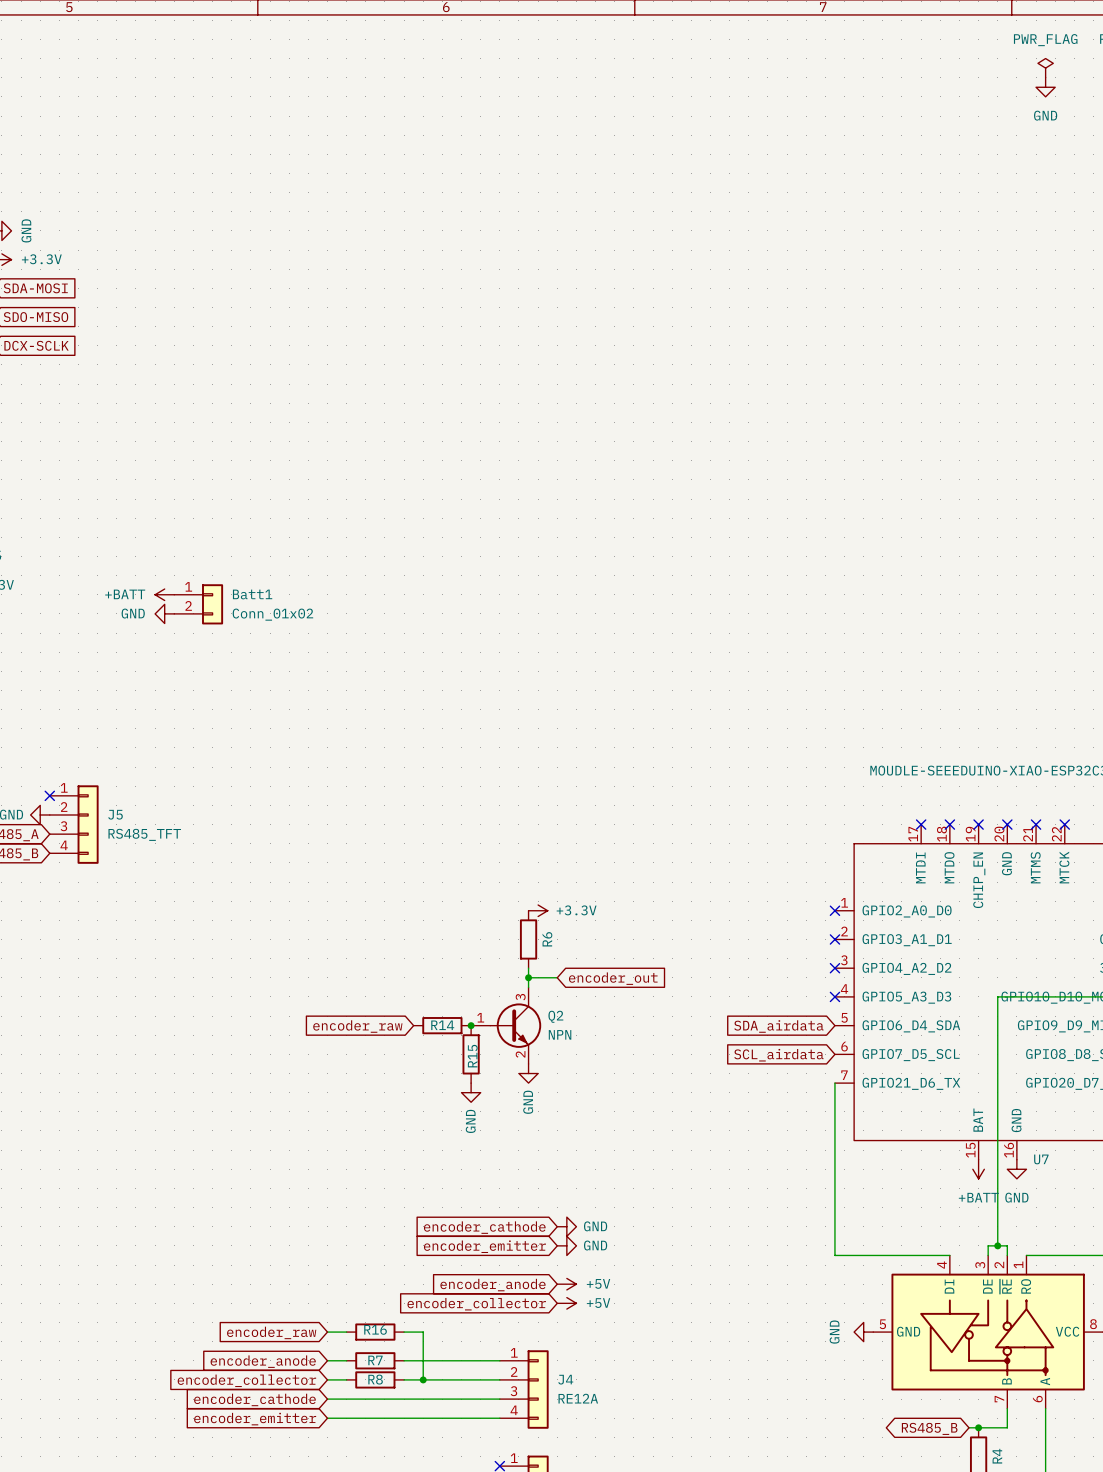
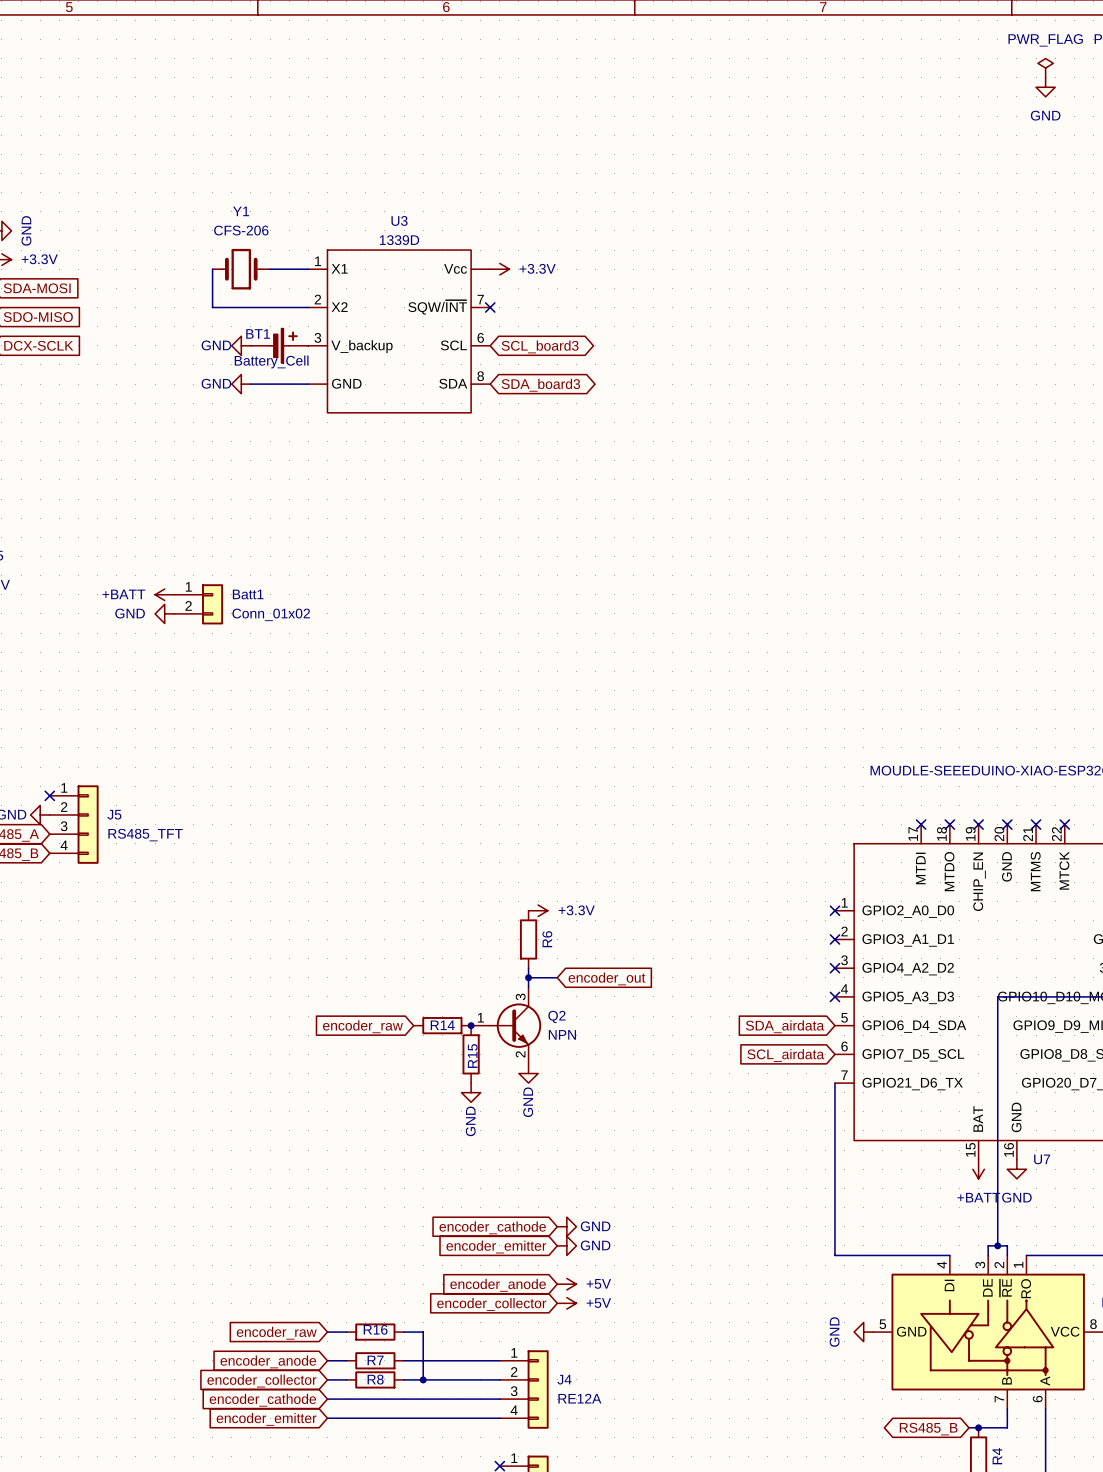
wire: none -> (212, 269) (212, 307) (308, 307)
Y1: none -> CFS-206 (241, 269)
wire: none -> (270, 269) (308, 269)
power symbol: none -> +3.3V (499, 269)
no-connect mark: none -> (490, 307)
U3: none -> 1339D (399, 331)
power symbol: none -> GND (241, 345)
BT1: none -> Battery_Cell (279, 345)
global label: none -> SCL_board3 (540, 346)
power symbol: none -> GND (241, 384)
wire: none -> (250, 384) (308, 384)
global label: none -> SDA_board3 (540, 385)

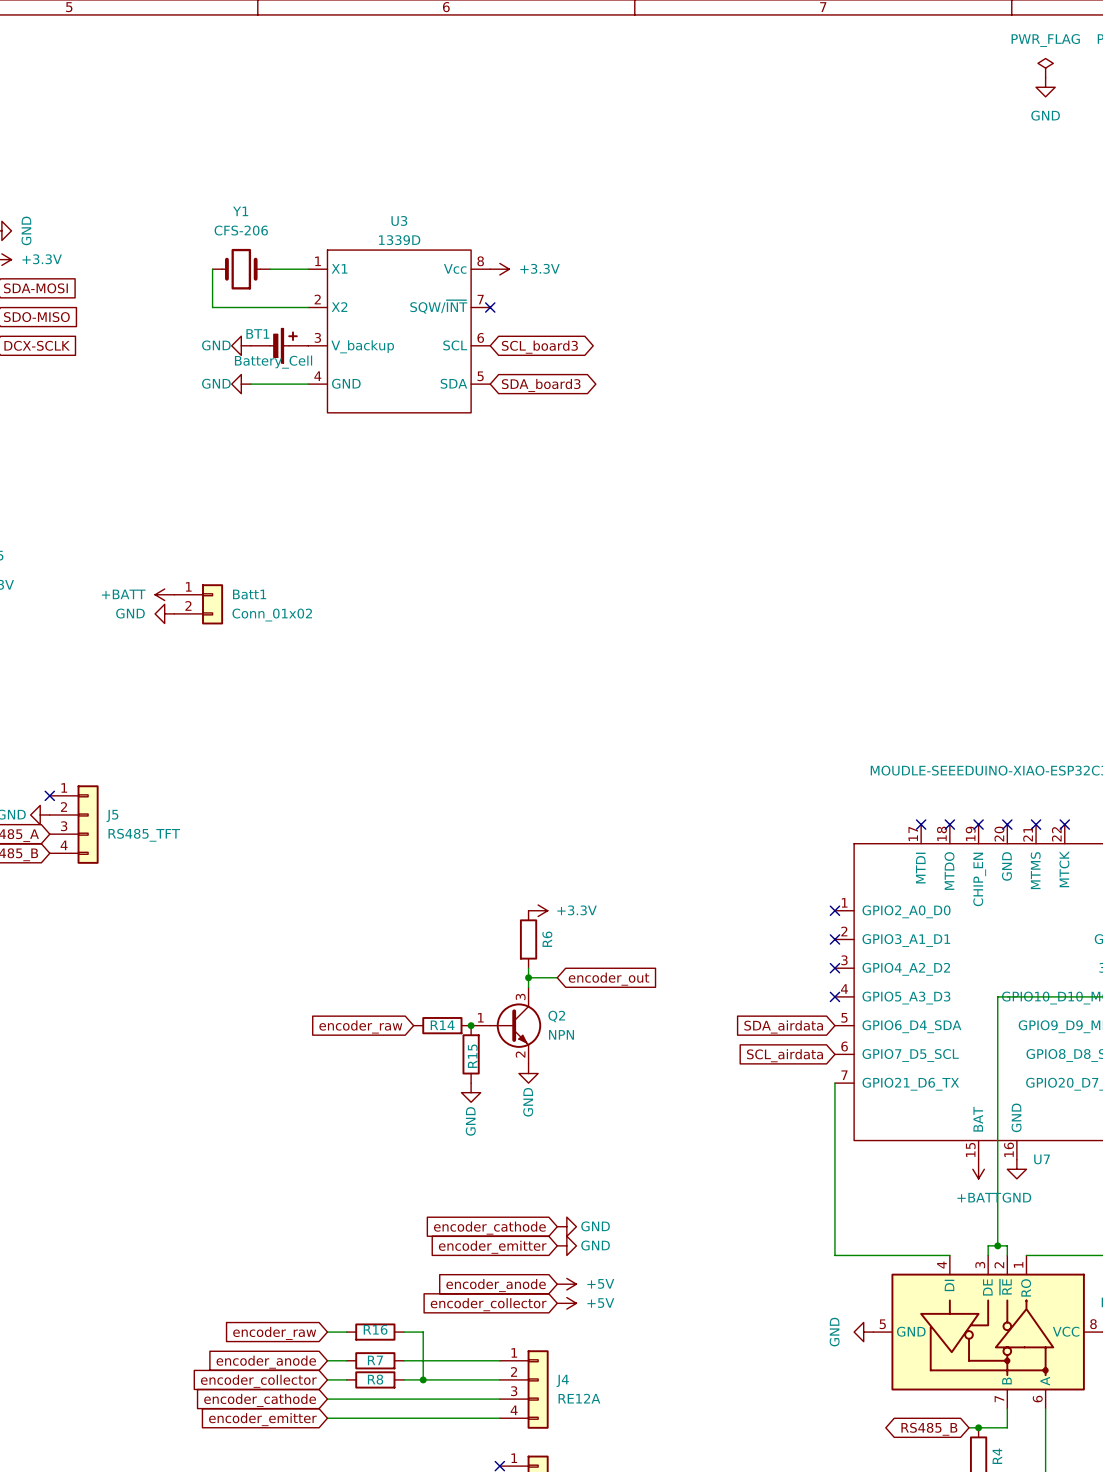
U3 pin number: none -> 8 (480, 261)
U3 pin number: none -> 4 (317, 376)
U3 pin number: 8 (480, 376) -> 5 (480, 376)

